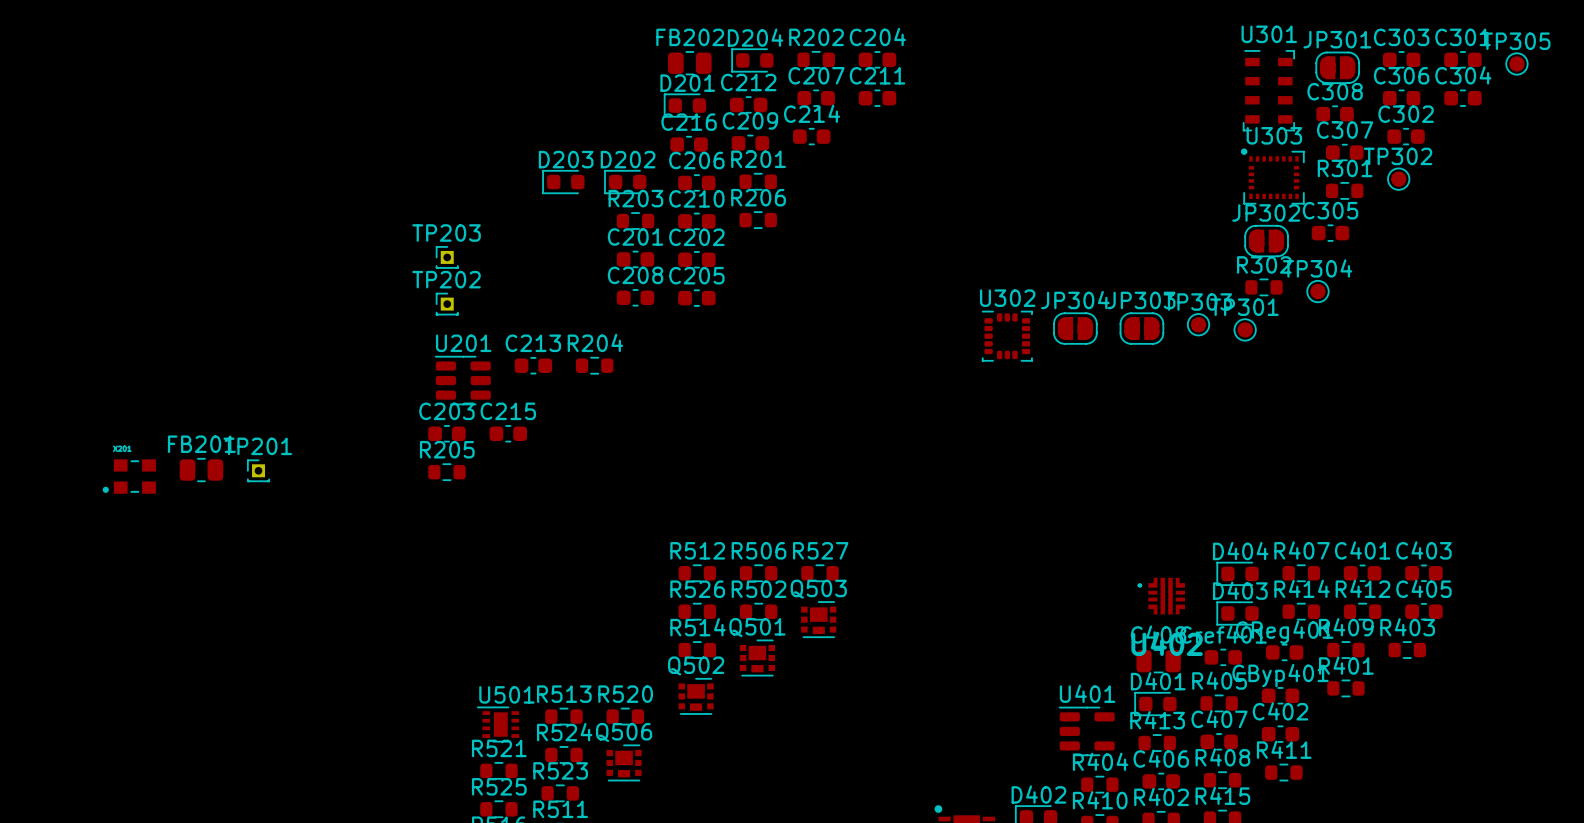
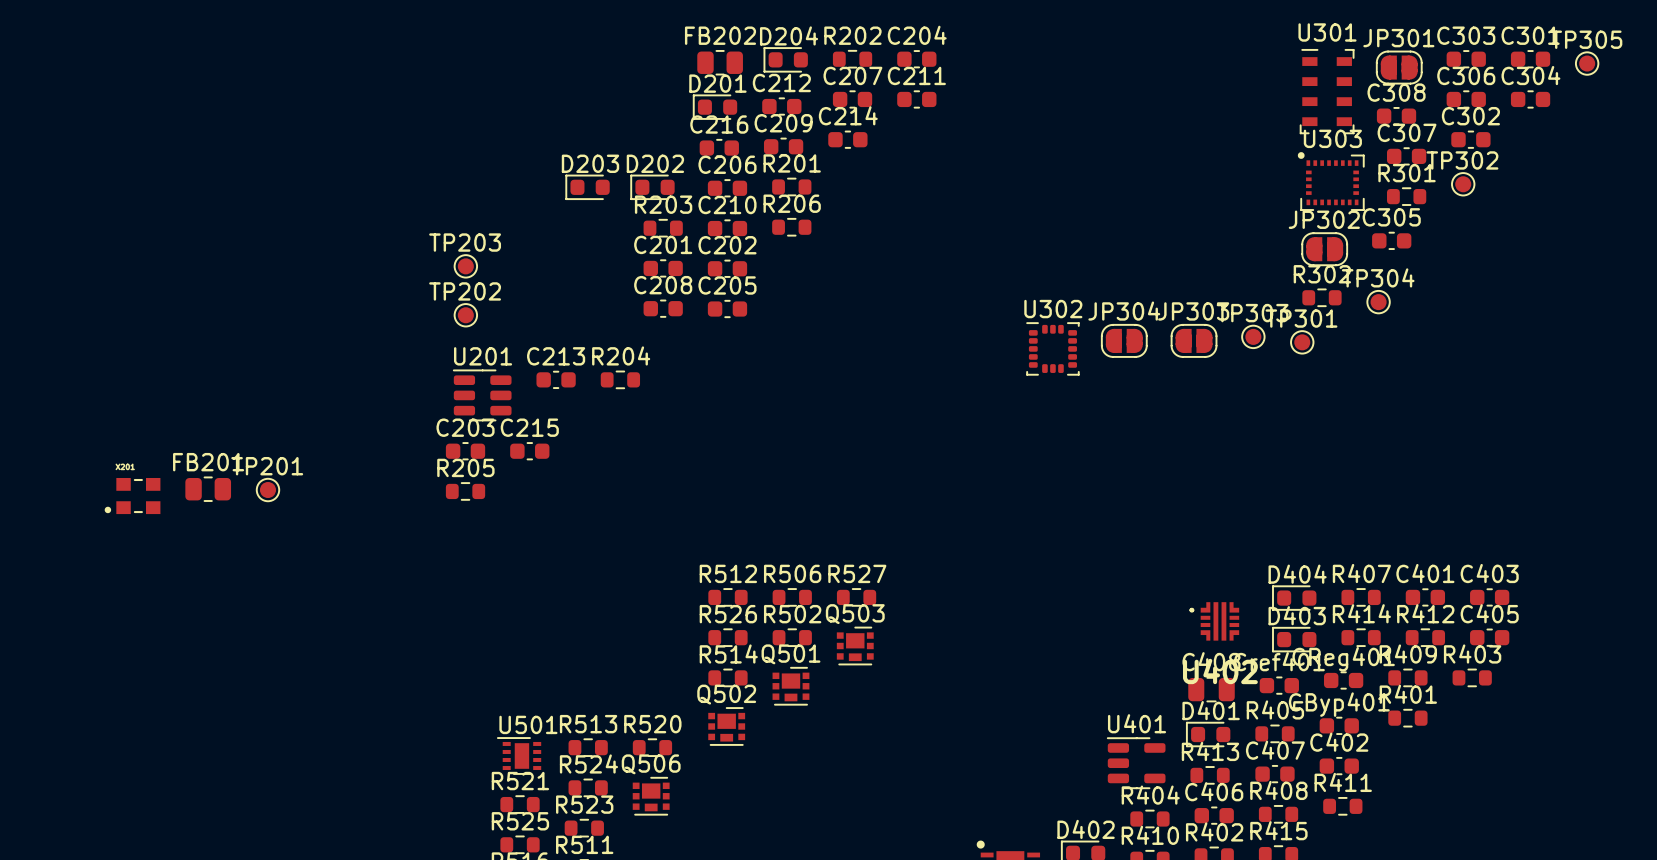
TP203 footprint: [435, 246, 459, 269] -> [453, 254, 479, 279]
TP202 footprint: [435, 292, 459, 316] -> [453, 303, 479, 328]
TP201 footprint: [246, 459, 271, 483] -> [255, 477, 281, 503]

